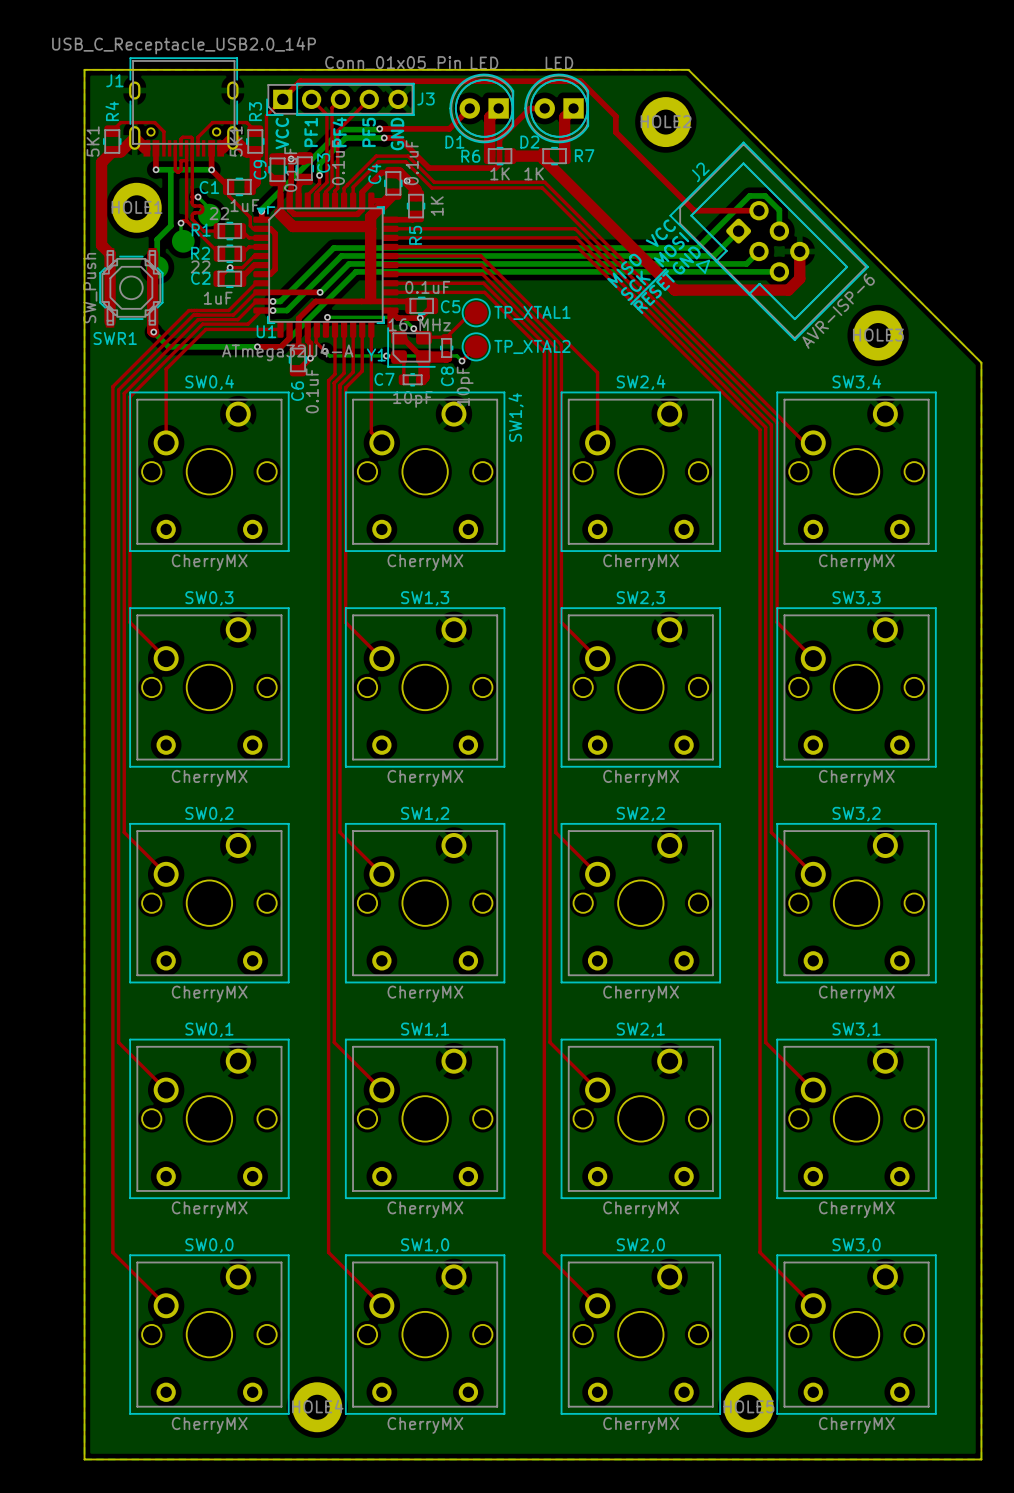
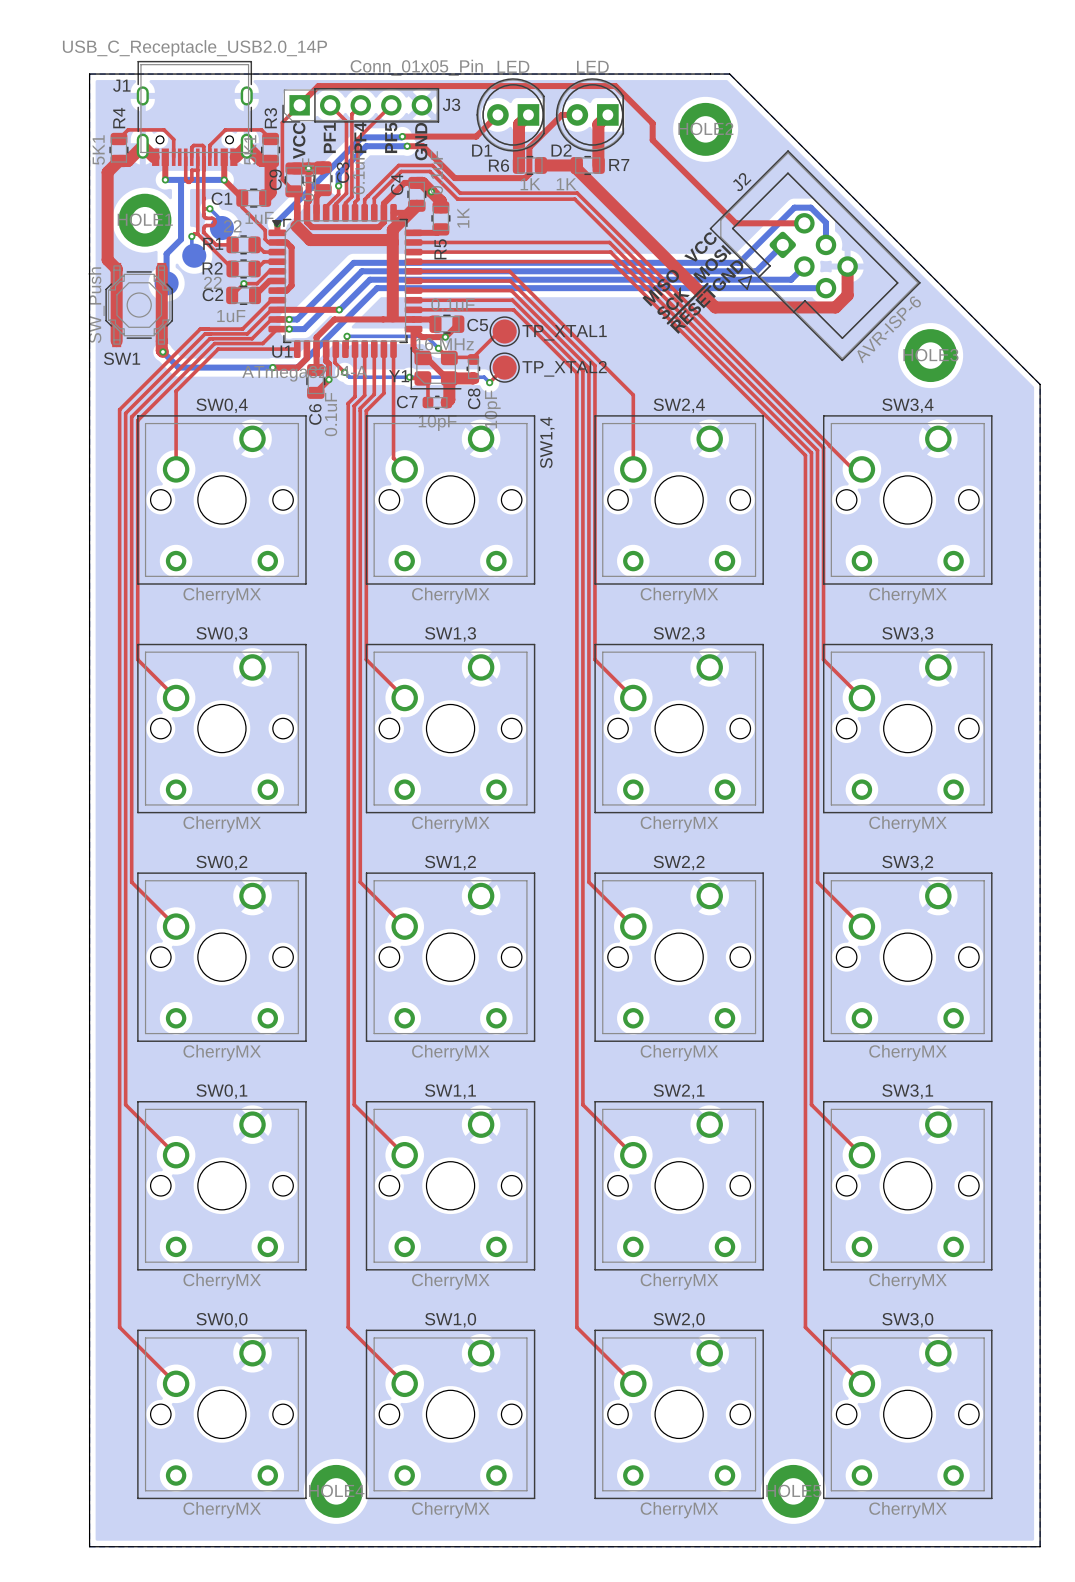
SWR1 name: SWR1 (115, 338) -> SW1 (122, 358)

